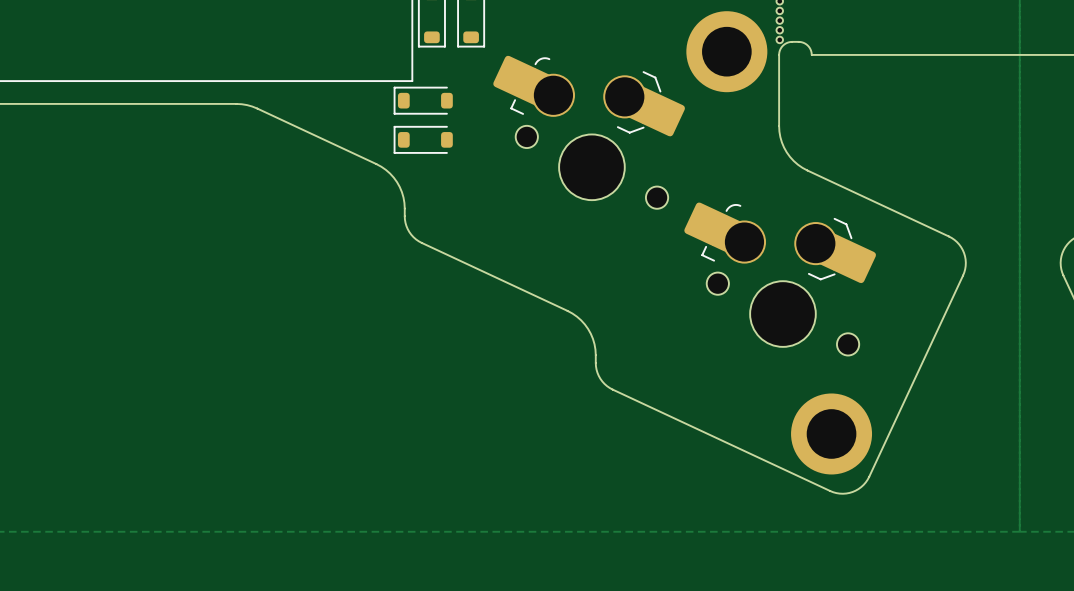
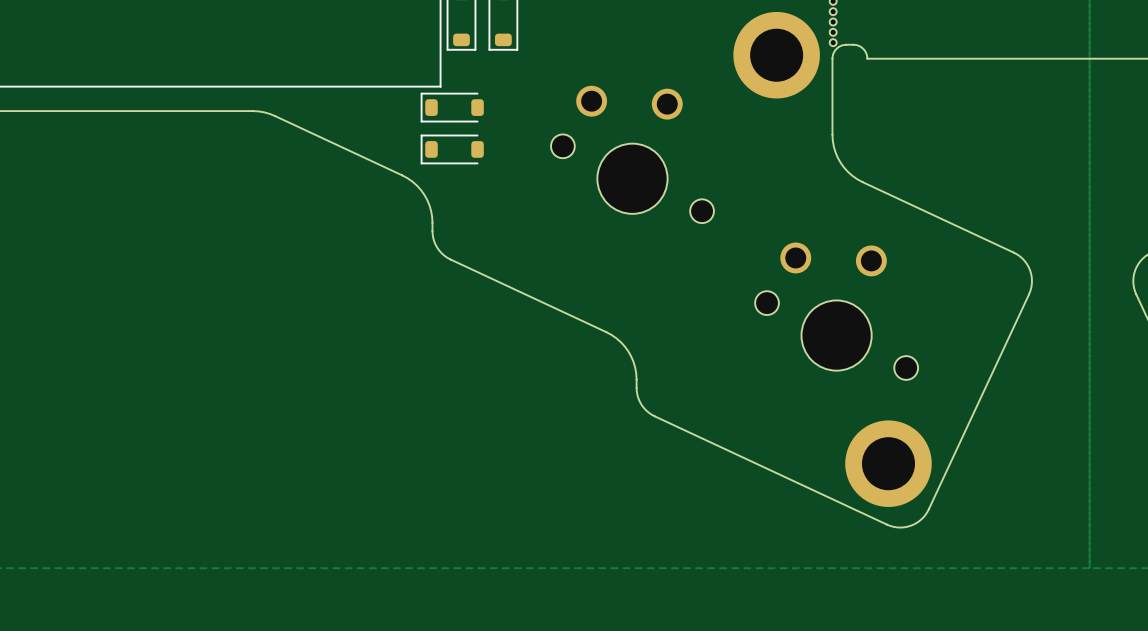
part footprint: [493, 55, 685, 209] -> [551, 85, 714, 224]
part footprint: [684, 202, 876, 356] -> [755, 242, 919, 380]

